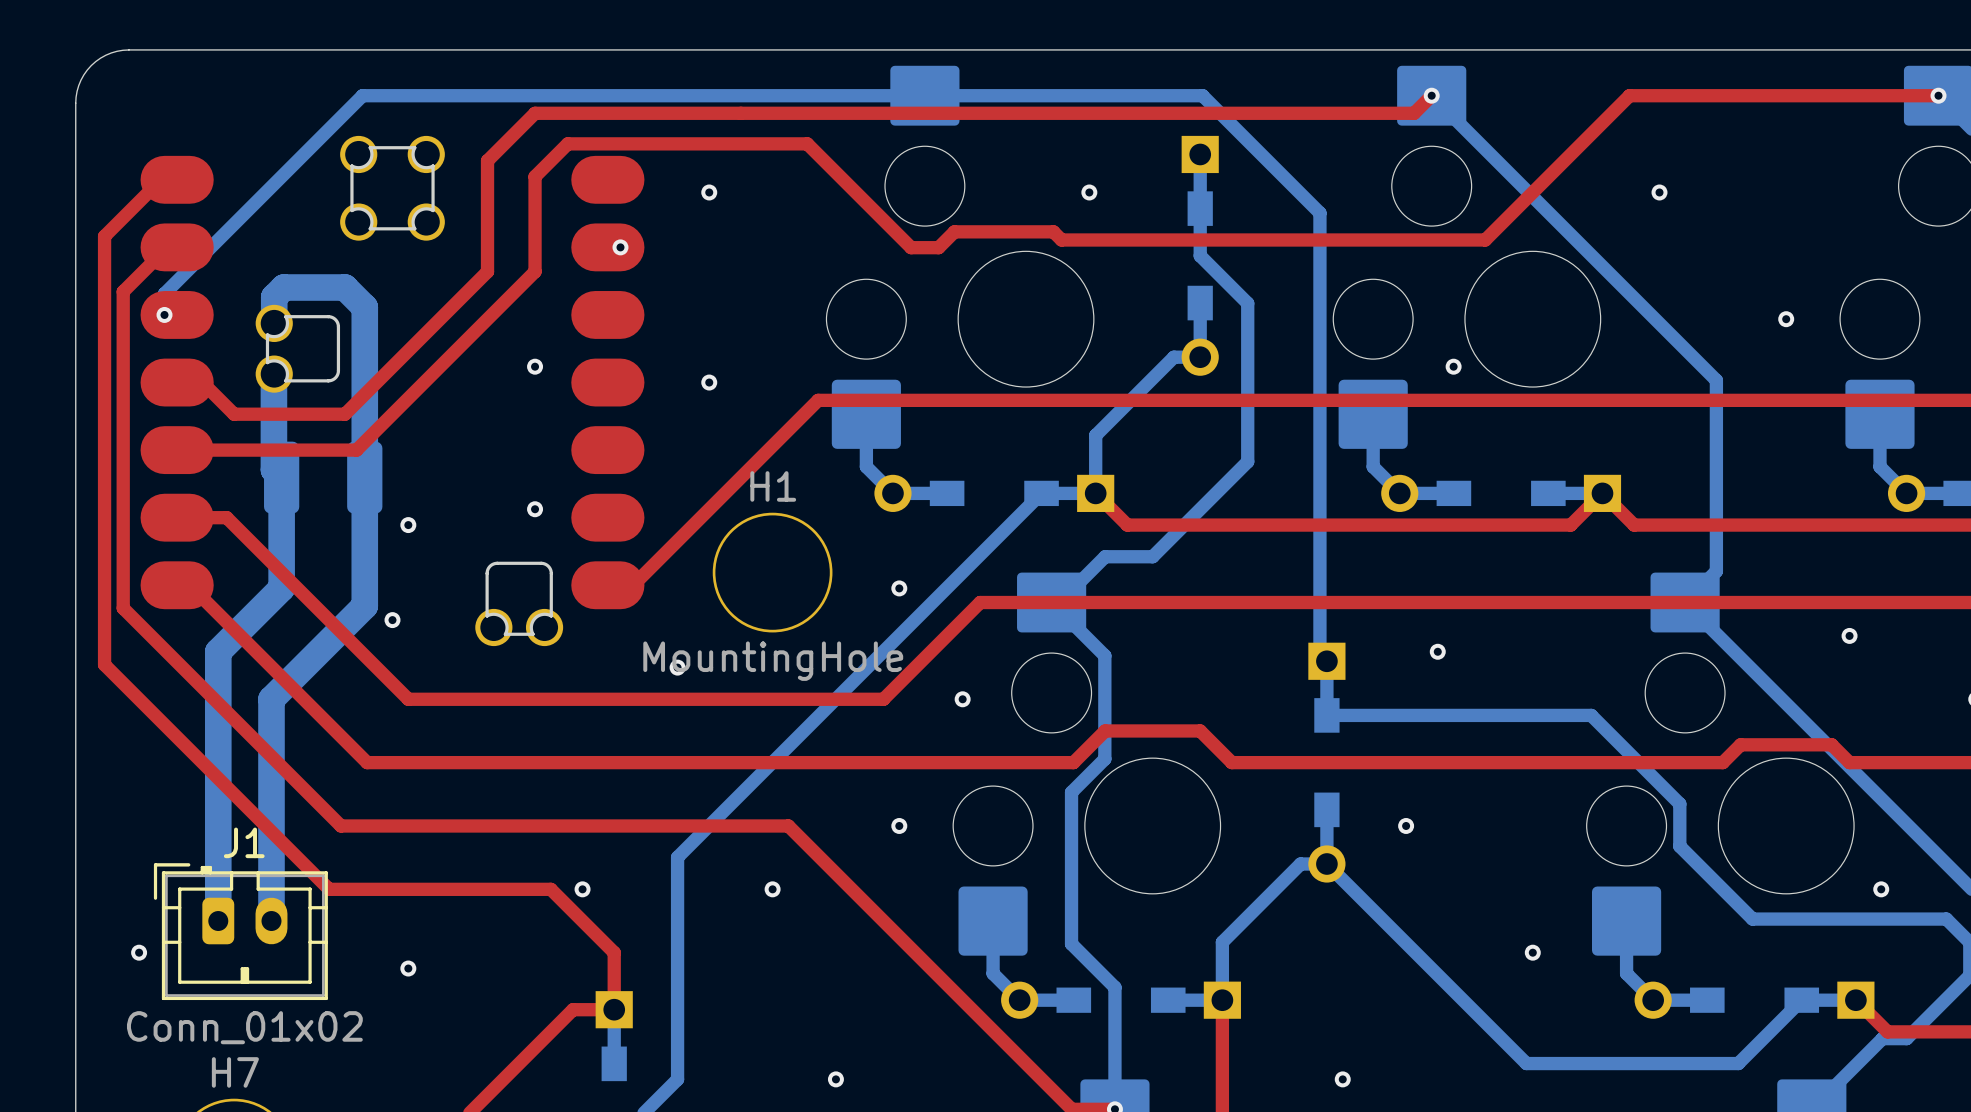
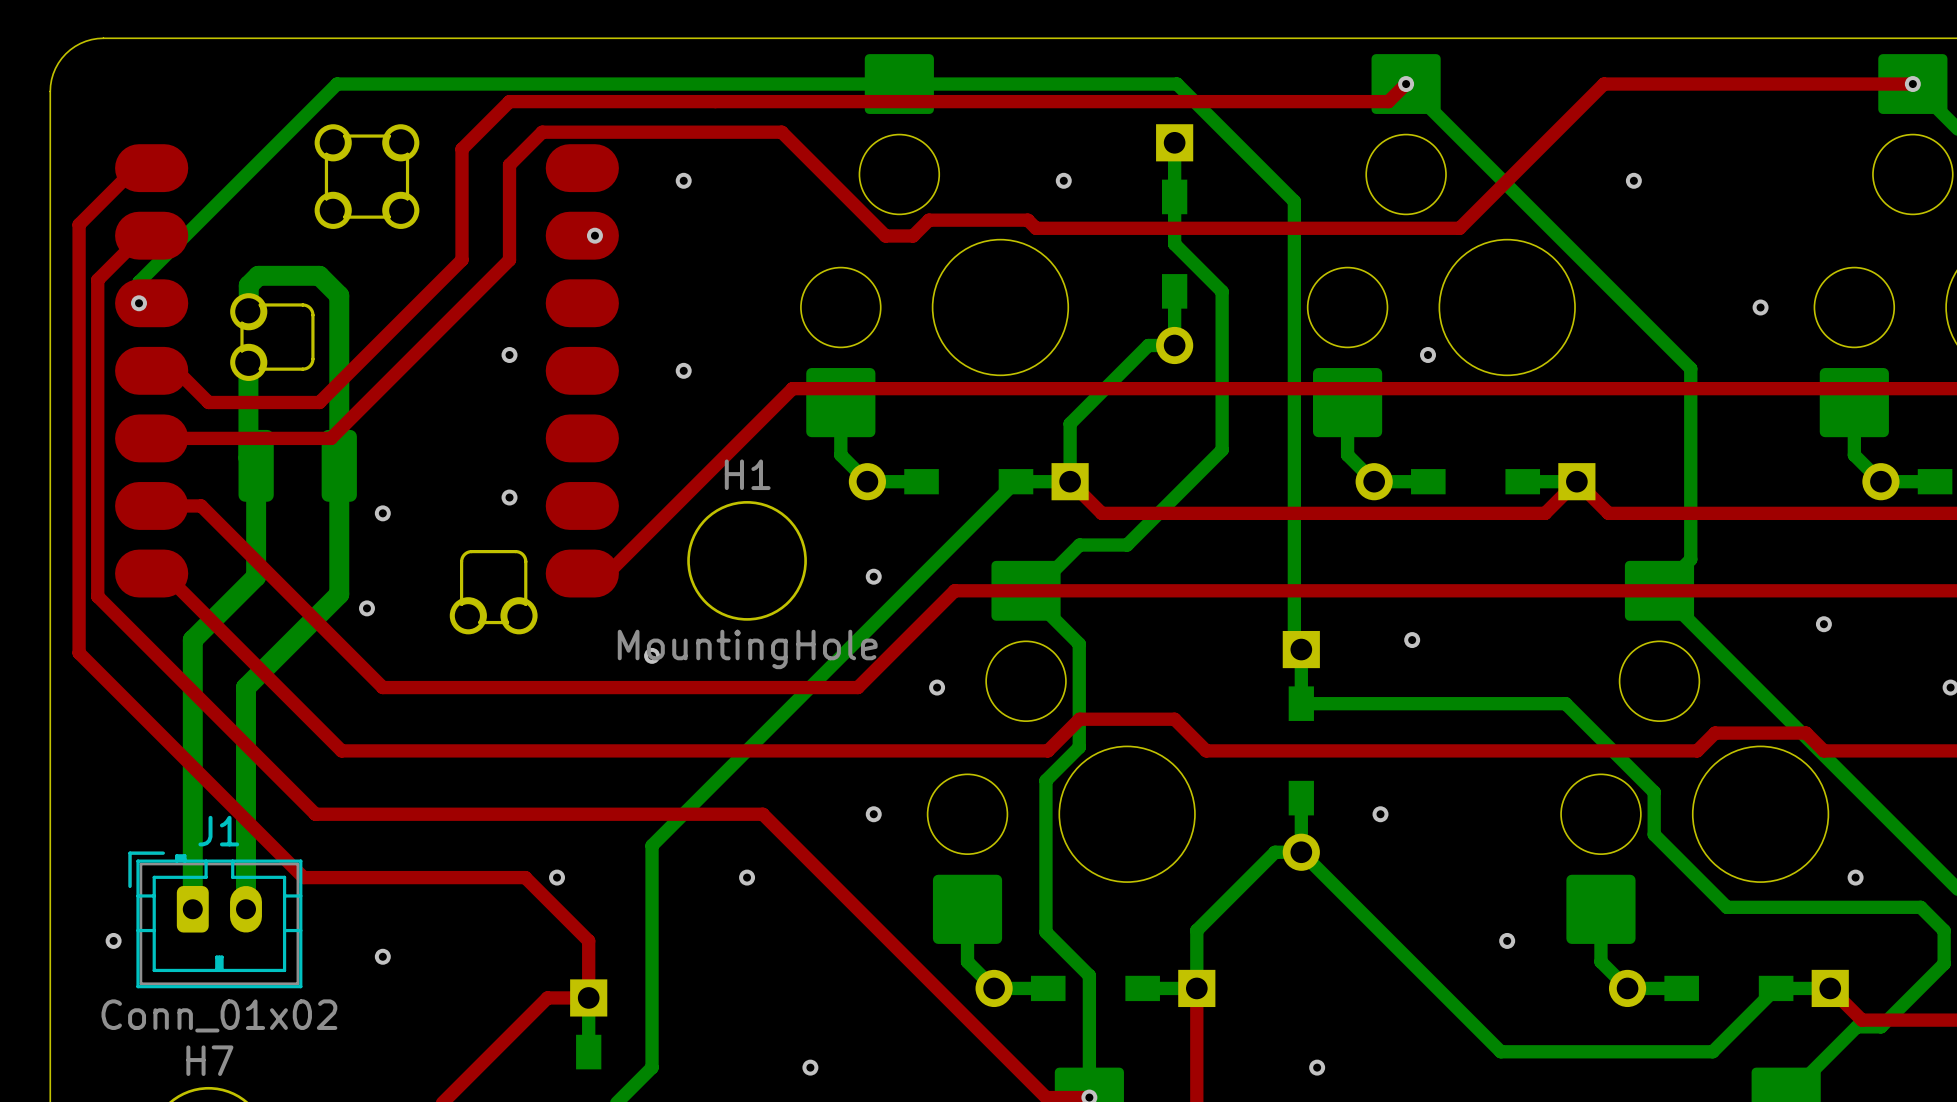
bottom track width: thick (274, 323) (274, 297) (283, 287) (344, 287) (364, 307) (364, 606) (271, 699) (271, 921) -> thin (248, 311) (248, 285) (258, 275) (319, 275) (339, 295) (339, 594) (246, 687) (246, 909)
bottom track width: thick (273, 387) (273, 469) (281, 477) (281, 588) (218, 651) (218, 921) -> thin (248, 376) (248, 458) (256, 465) (256, 576) (192, 640) (192, 909)

